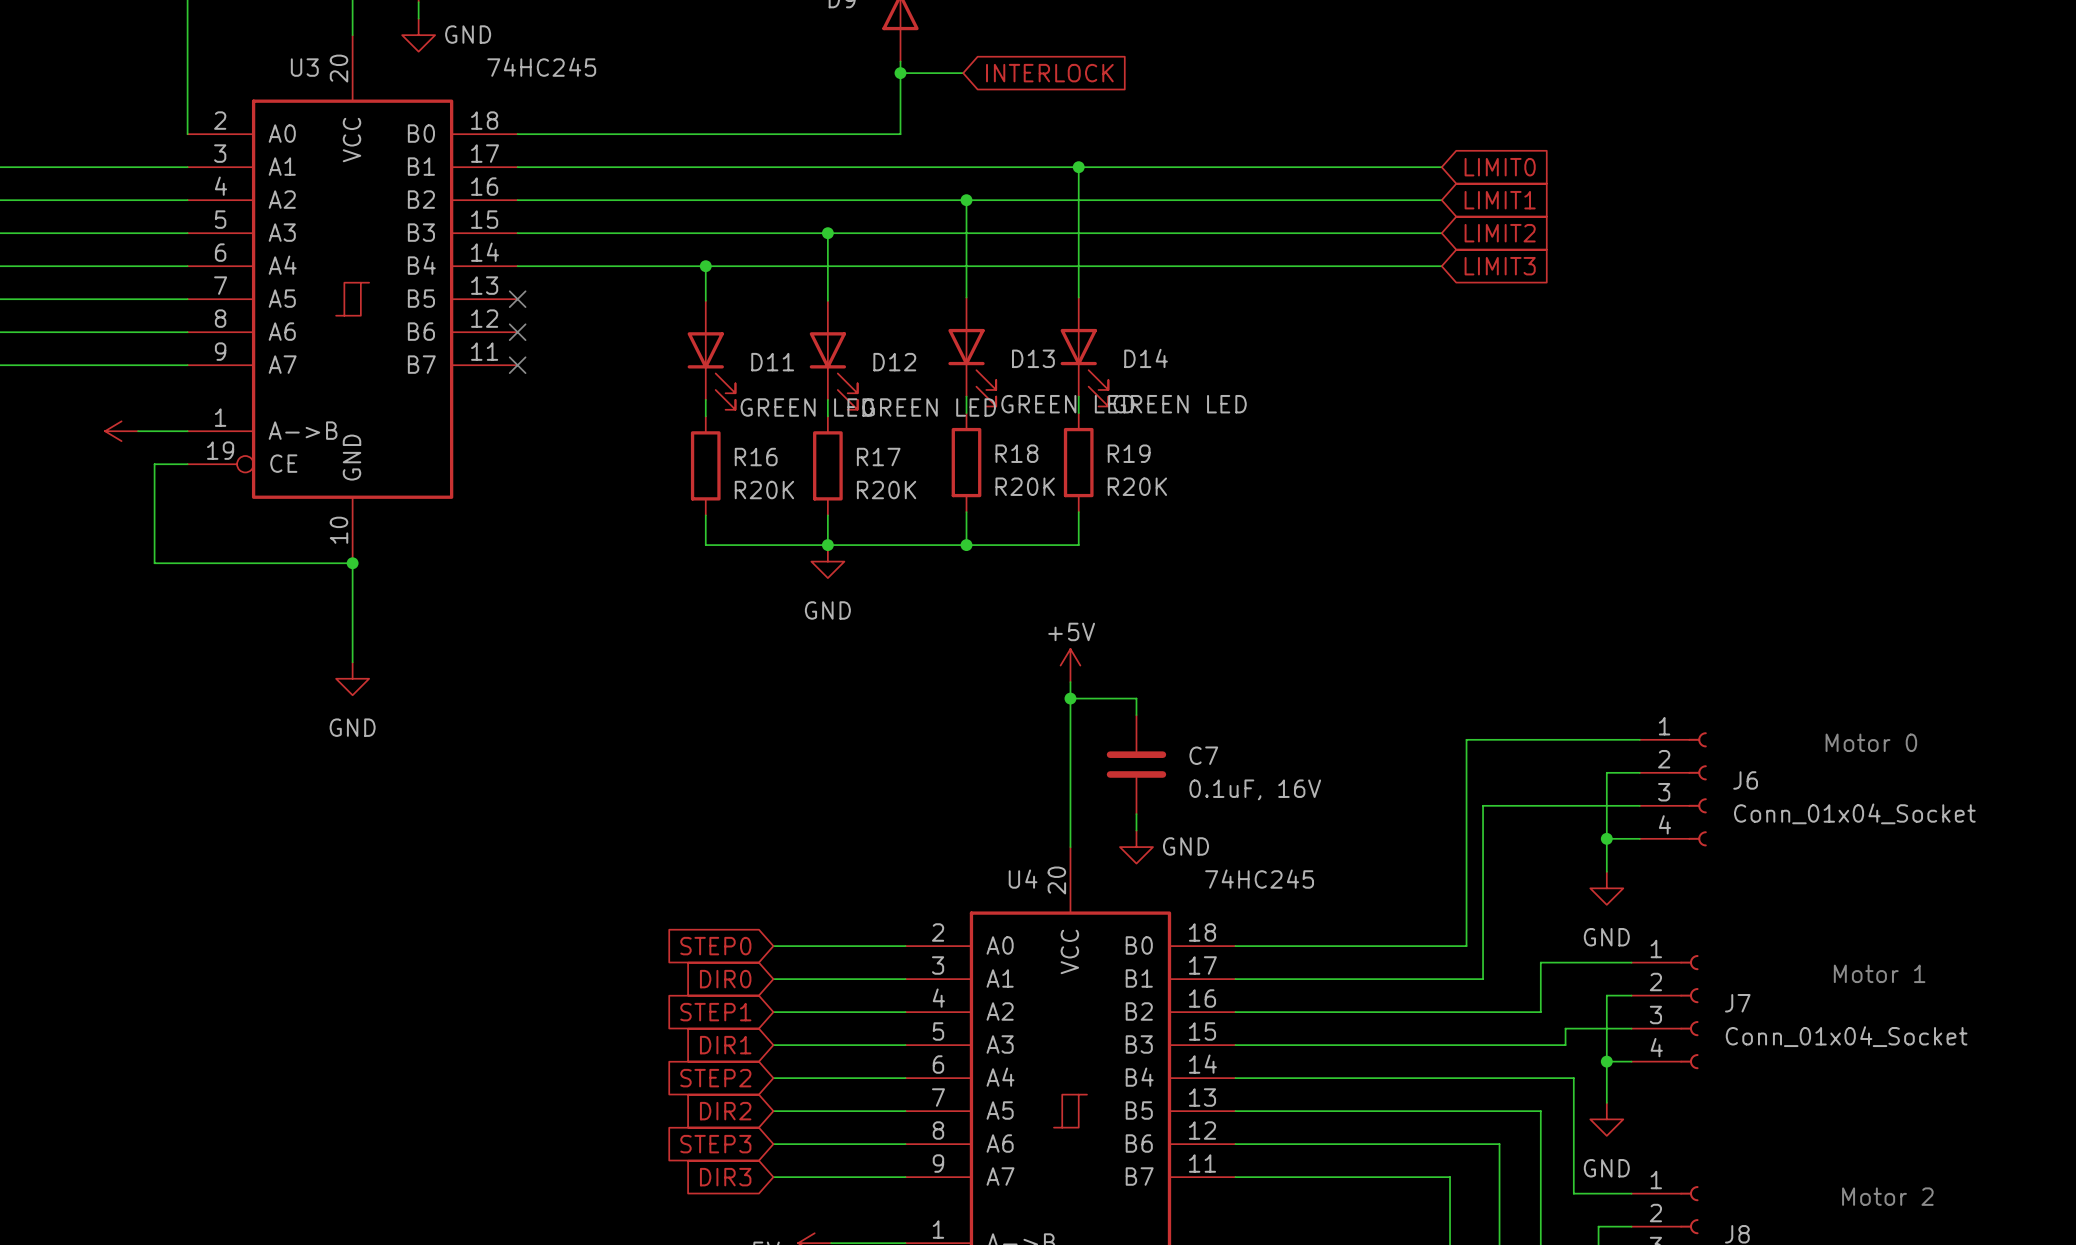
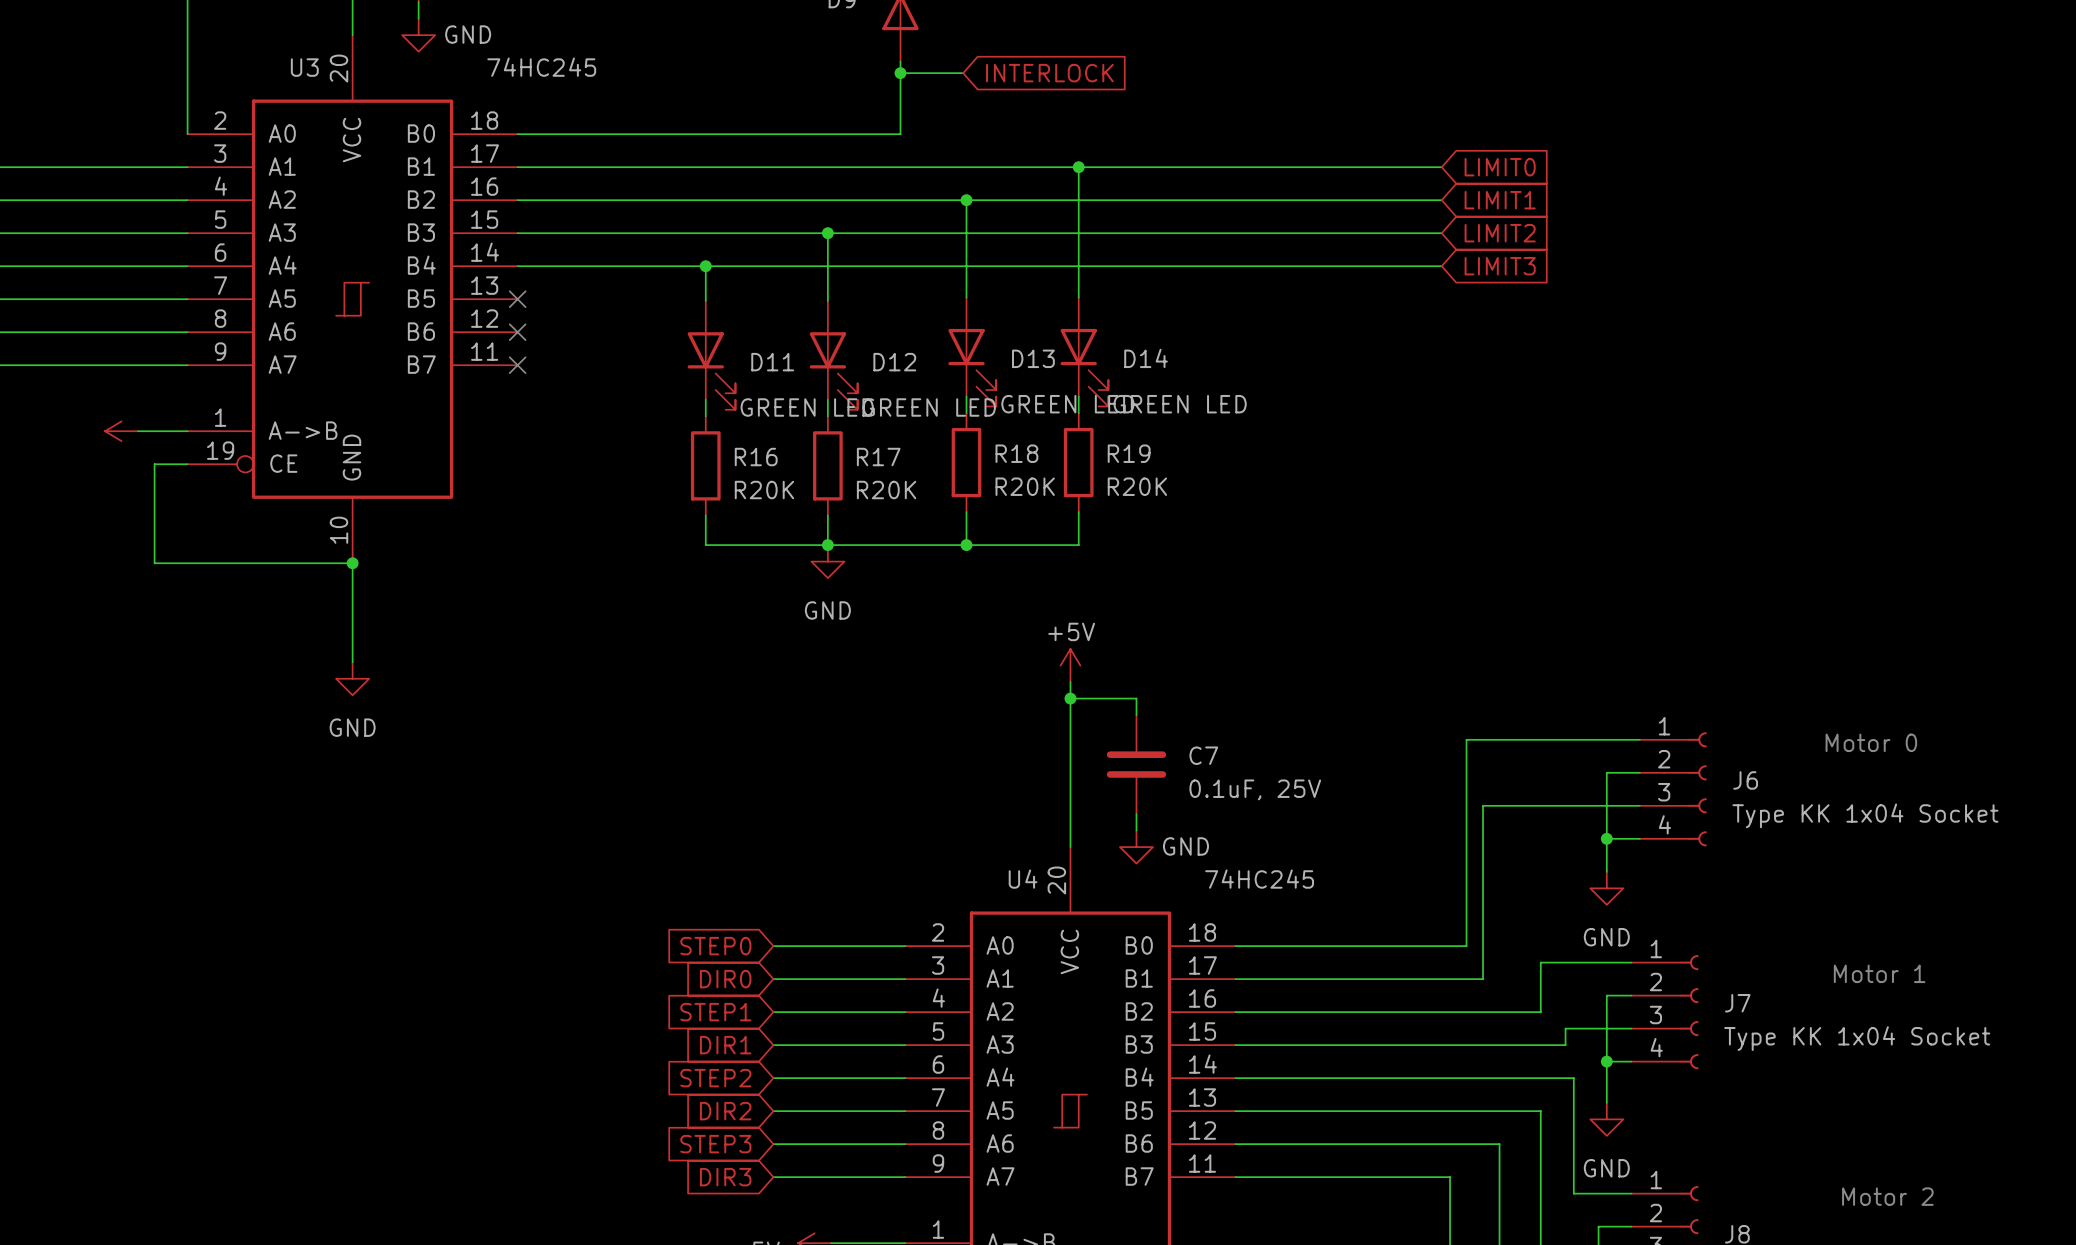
C7 value: 0.1uF, 16V (1255, 789) -> 0.1uF, 25V (1255, 789)
J6 value: Conn_01x04_Socket (1854, 813) -> Type KK 1x04 Socket (1865, 815)
J7 value: Conn_01x04_Socket (1846, 1036) -> Type KK 1x04 Socket (1857, 1038)

